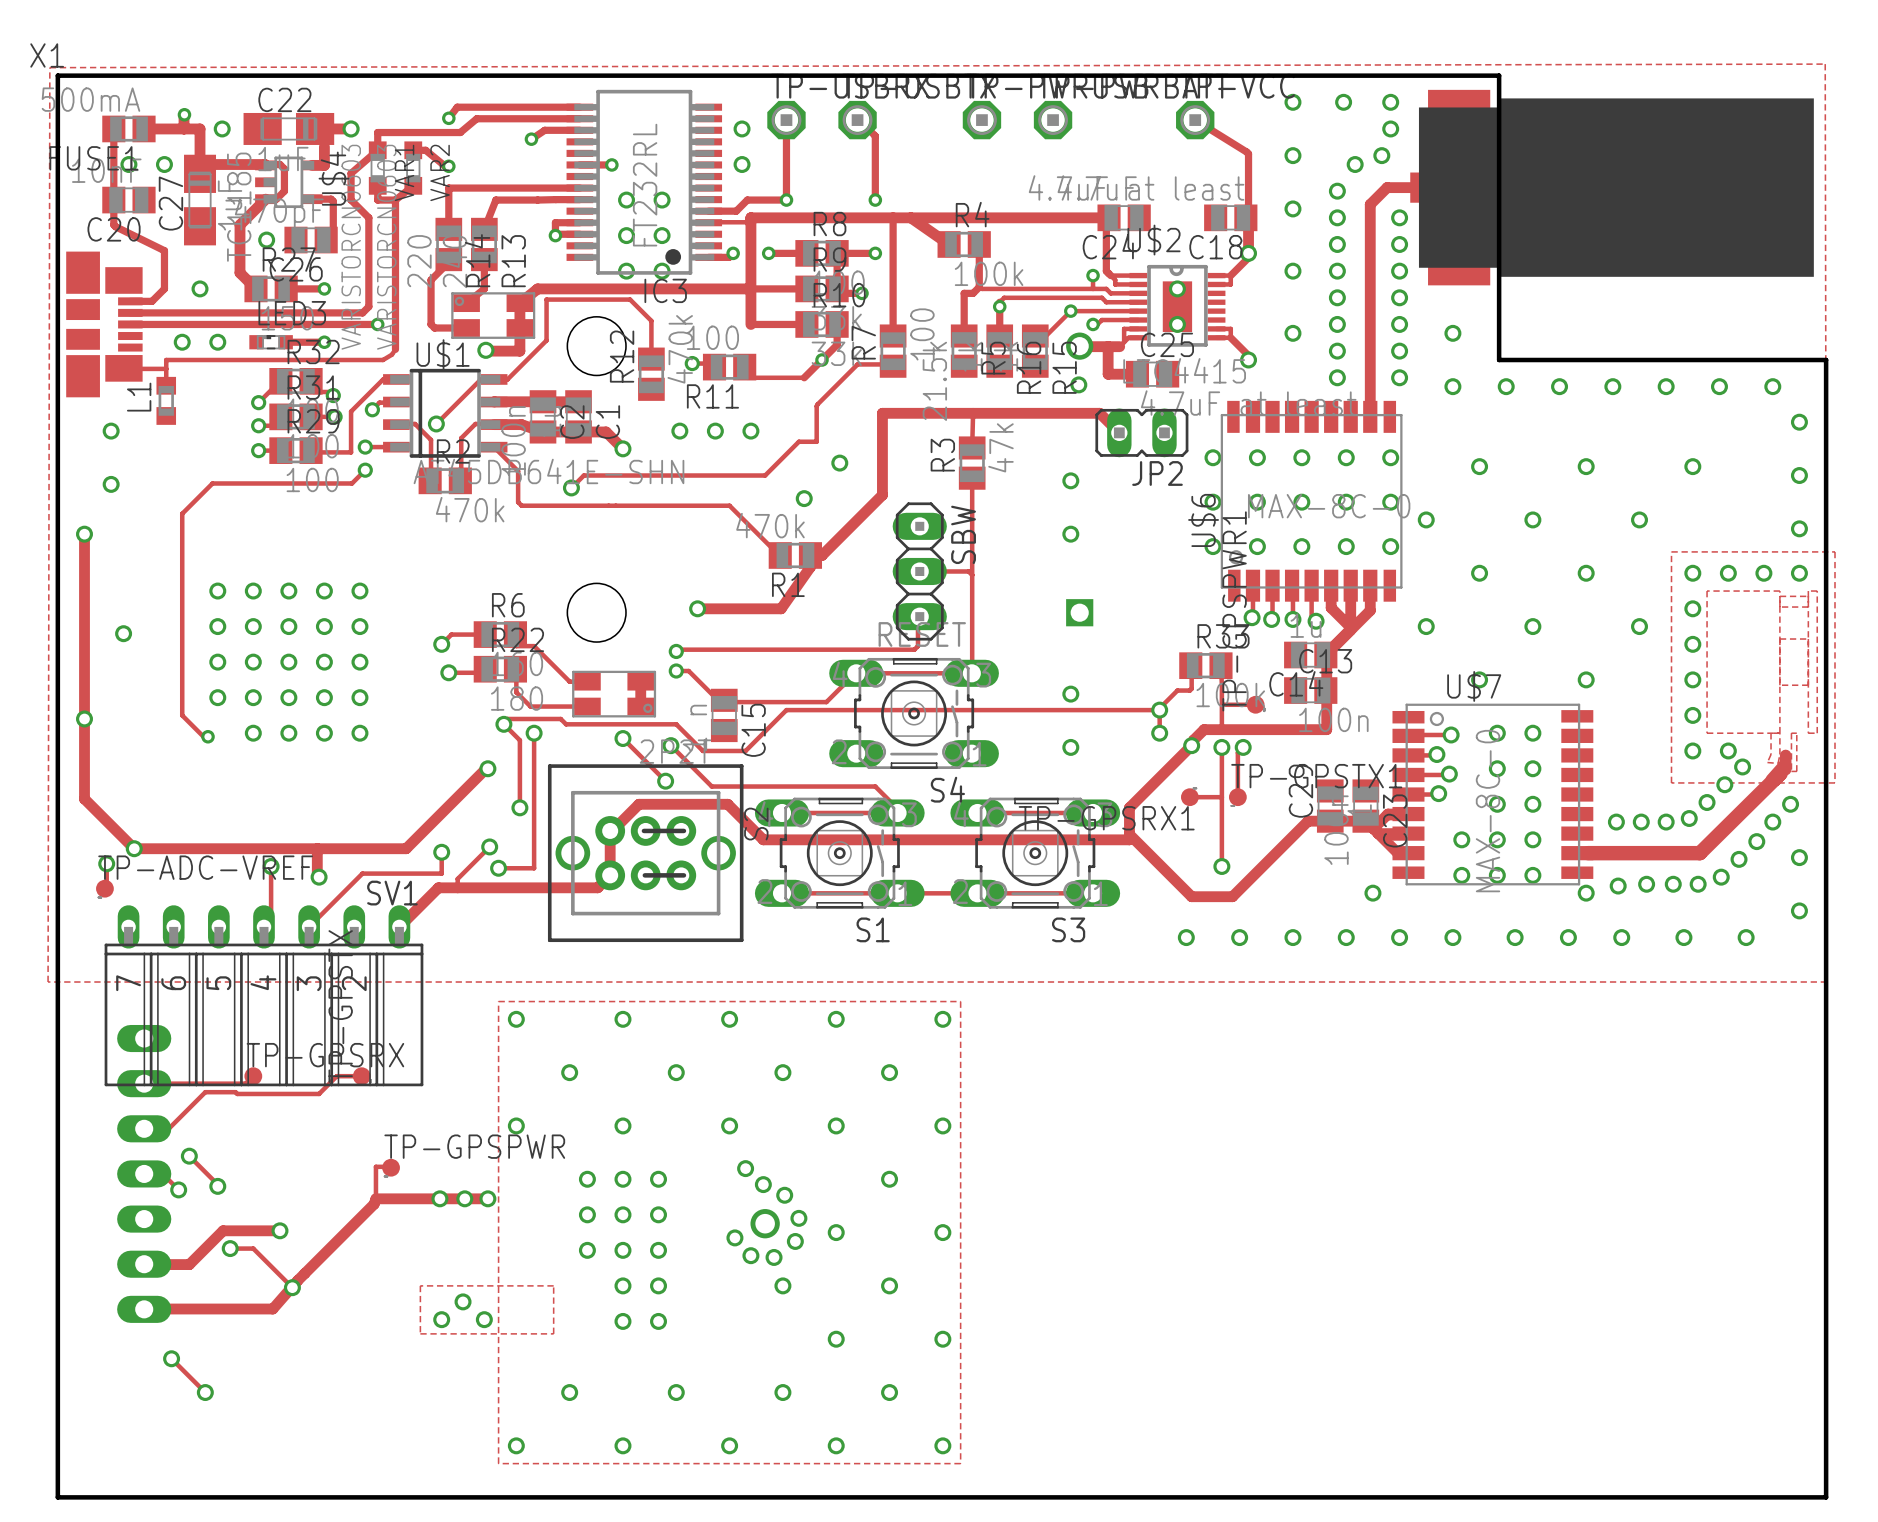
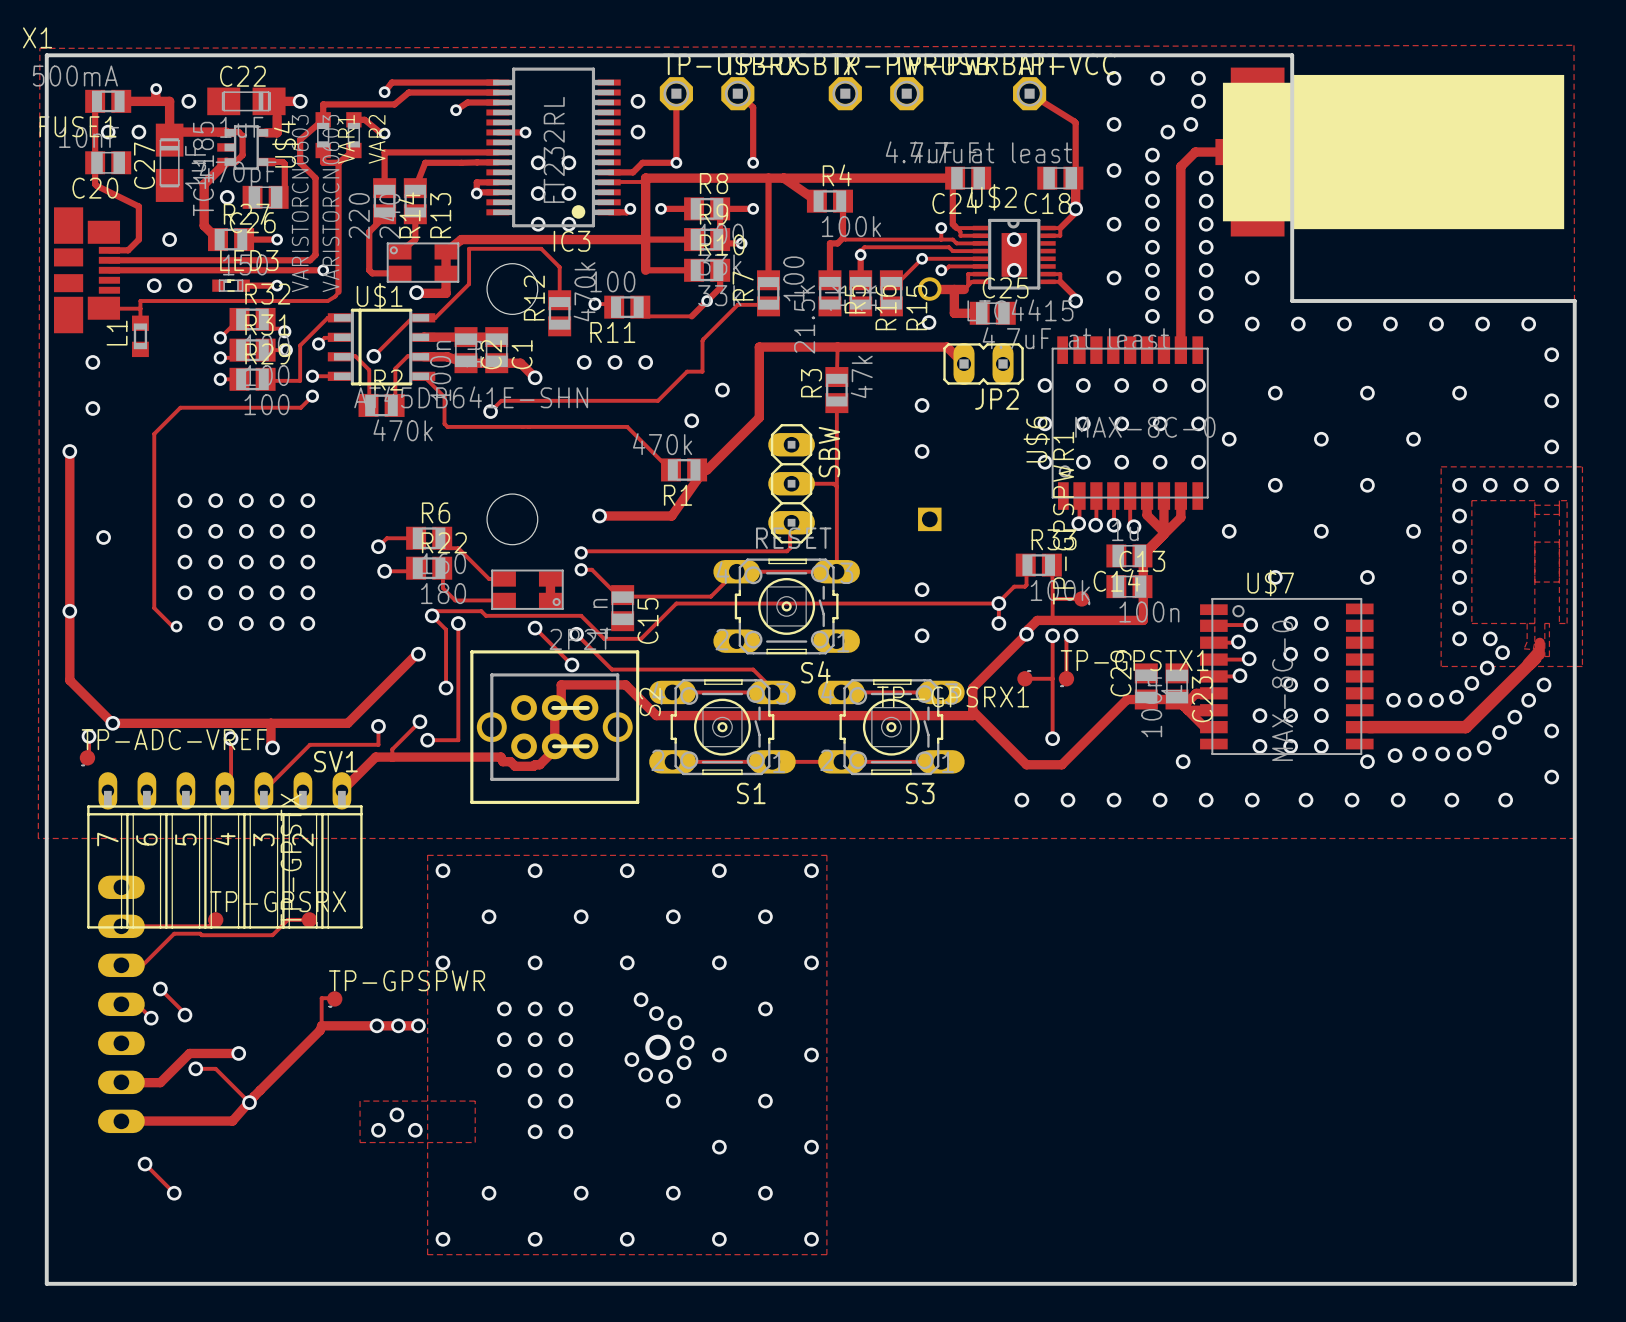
track: (653, 804) (638, 804) (617, 825) (612, 825) (610, 830) (610, 875) (597, 887) (583, 887) -> (561, 684) (561, 706) (554, 707) (553, 750) (539, 764) (533, 766) (515, 766) (510, 761) (502, 761) (501, 757)

